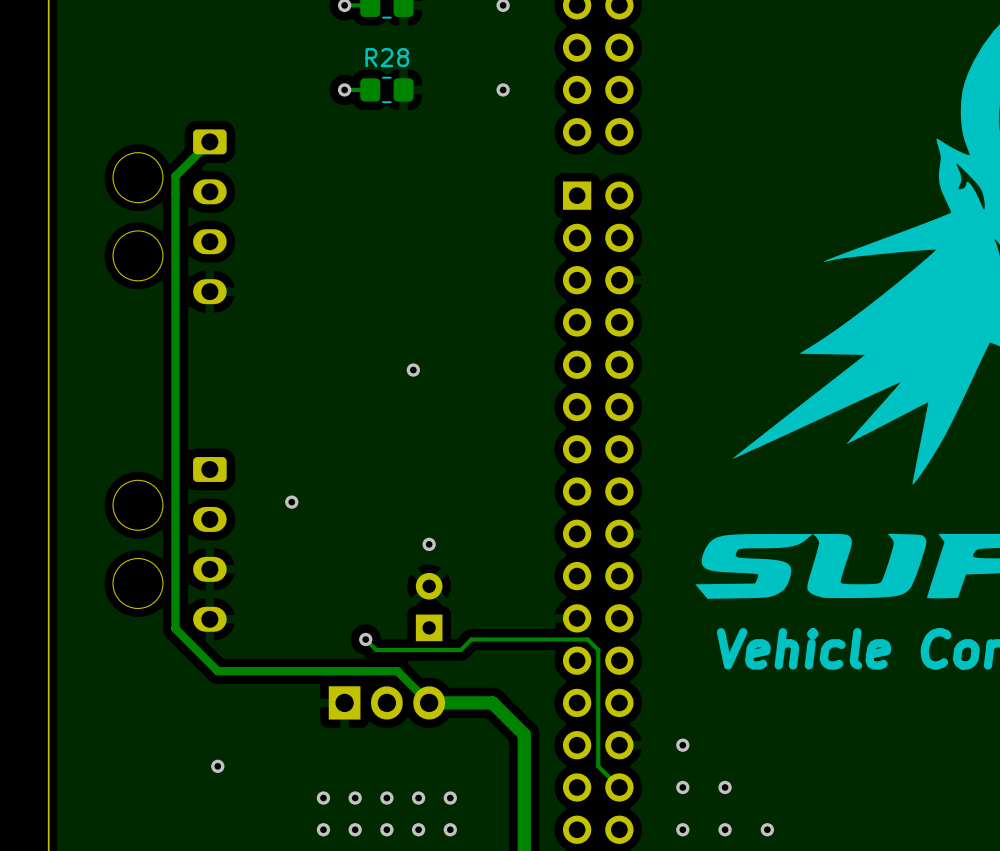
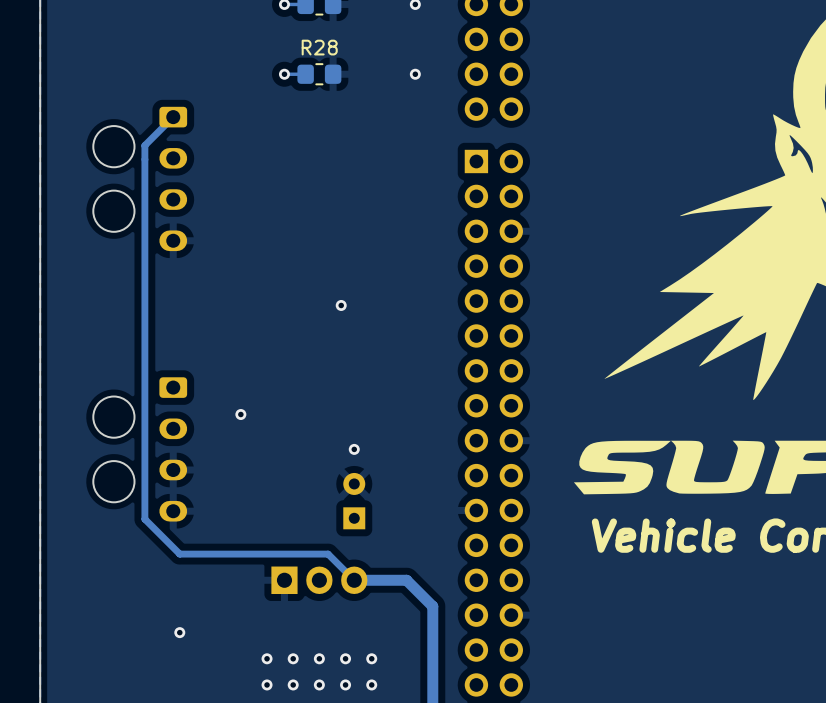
track: (365, 639) (376, 650) (460, 650) (471, 639) (587, 639) (598, 650) (598, 766) (619, 787) -> none
via: (365, 639) -> none
via: (682, 745) -> none
via: (682, 787) -> none
via: (725, 787) -> none
via: (682, 829) -> none
via: (725, 829) -> none
via: (767, 829) -> none

